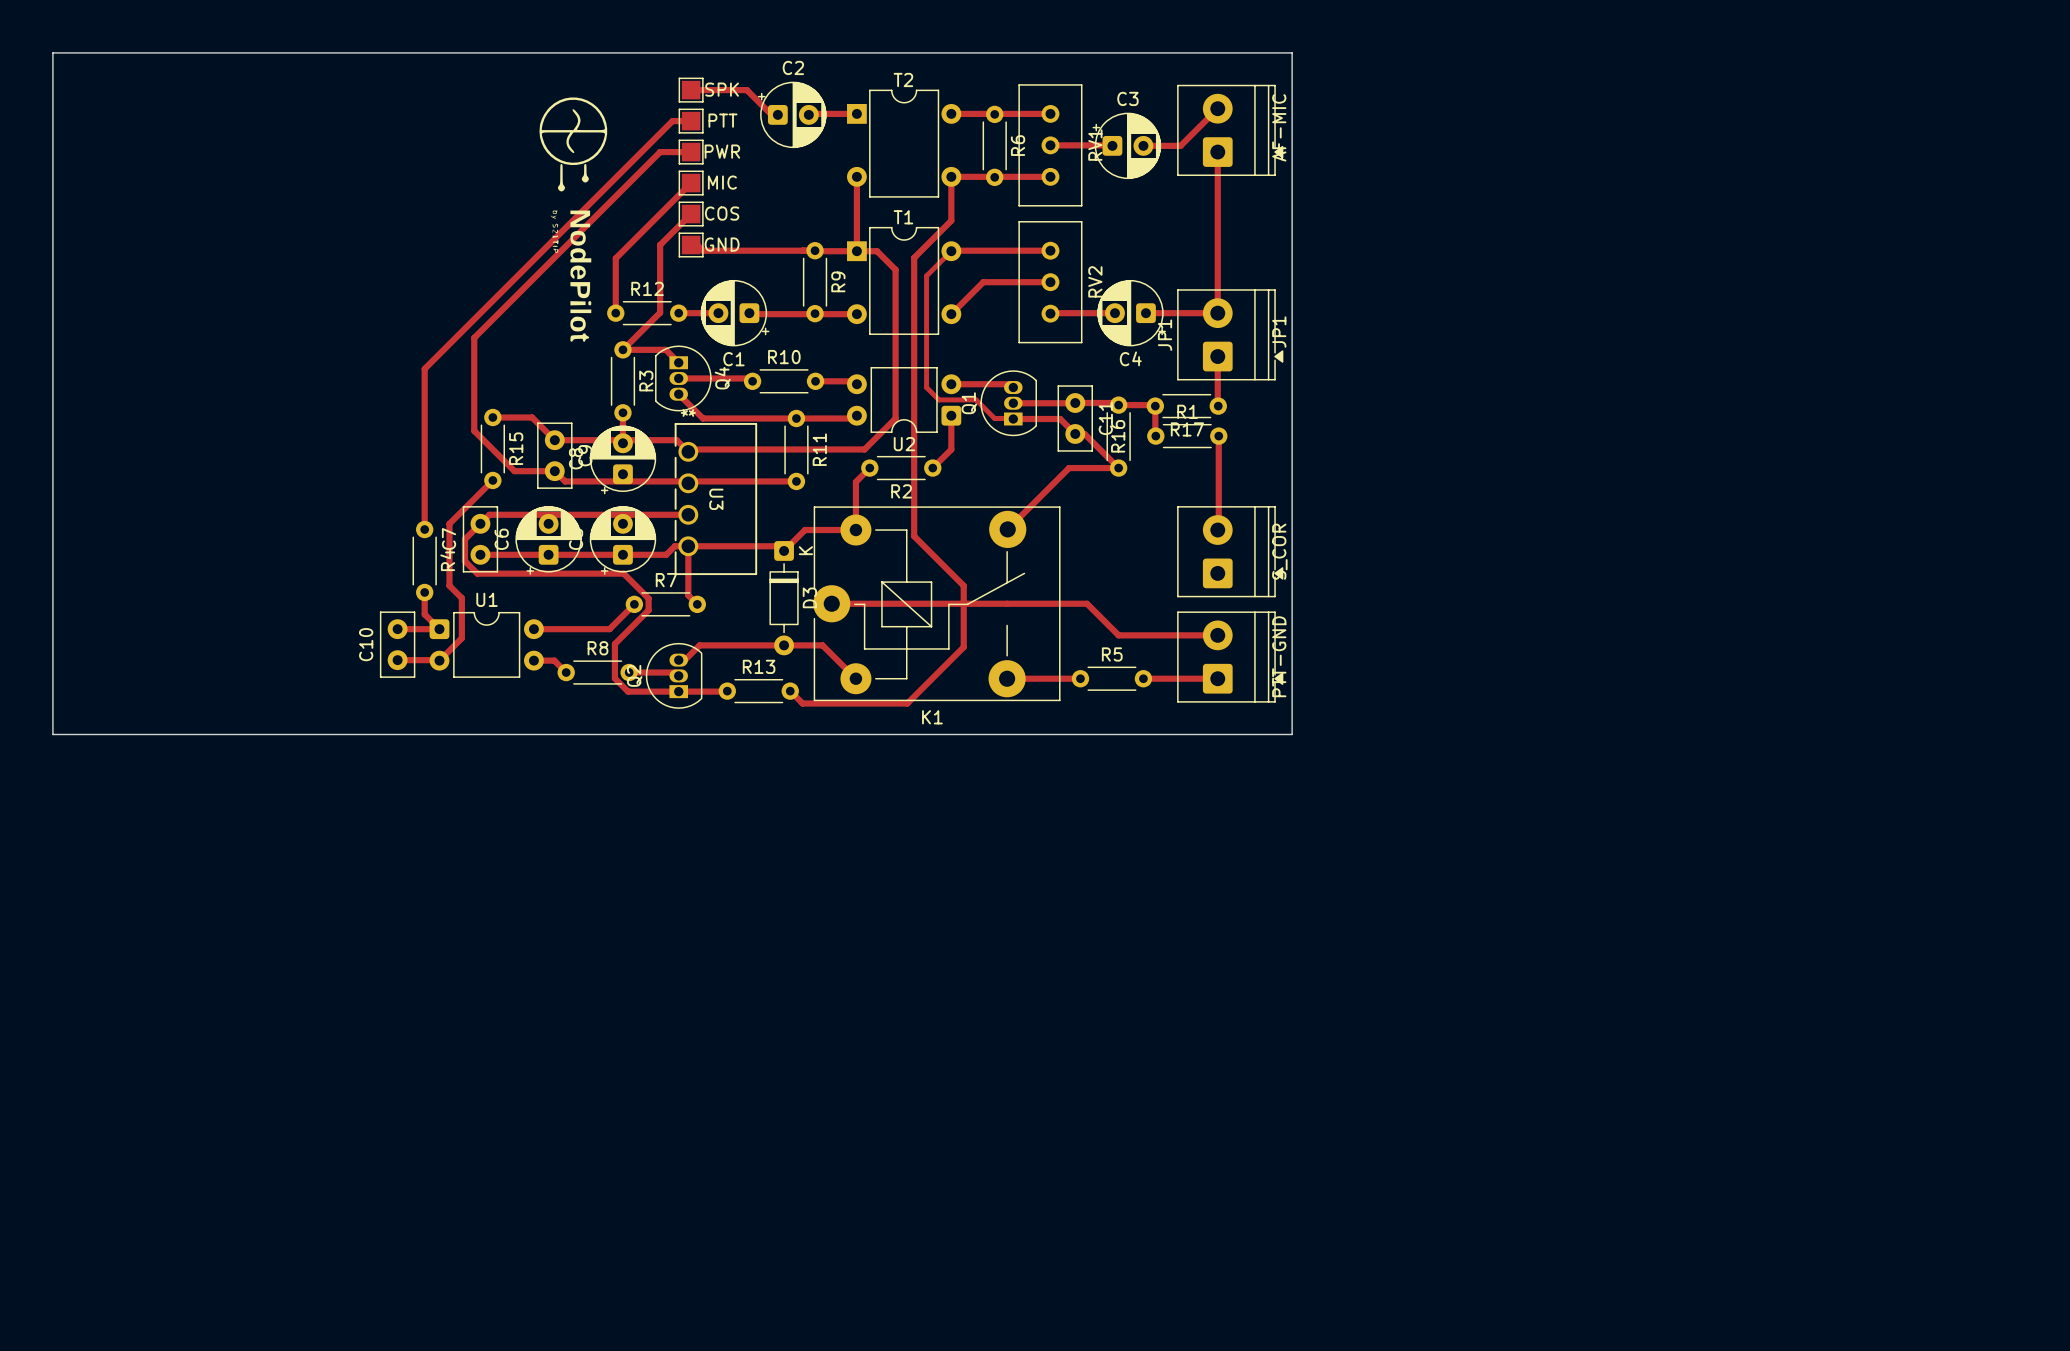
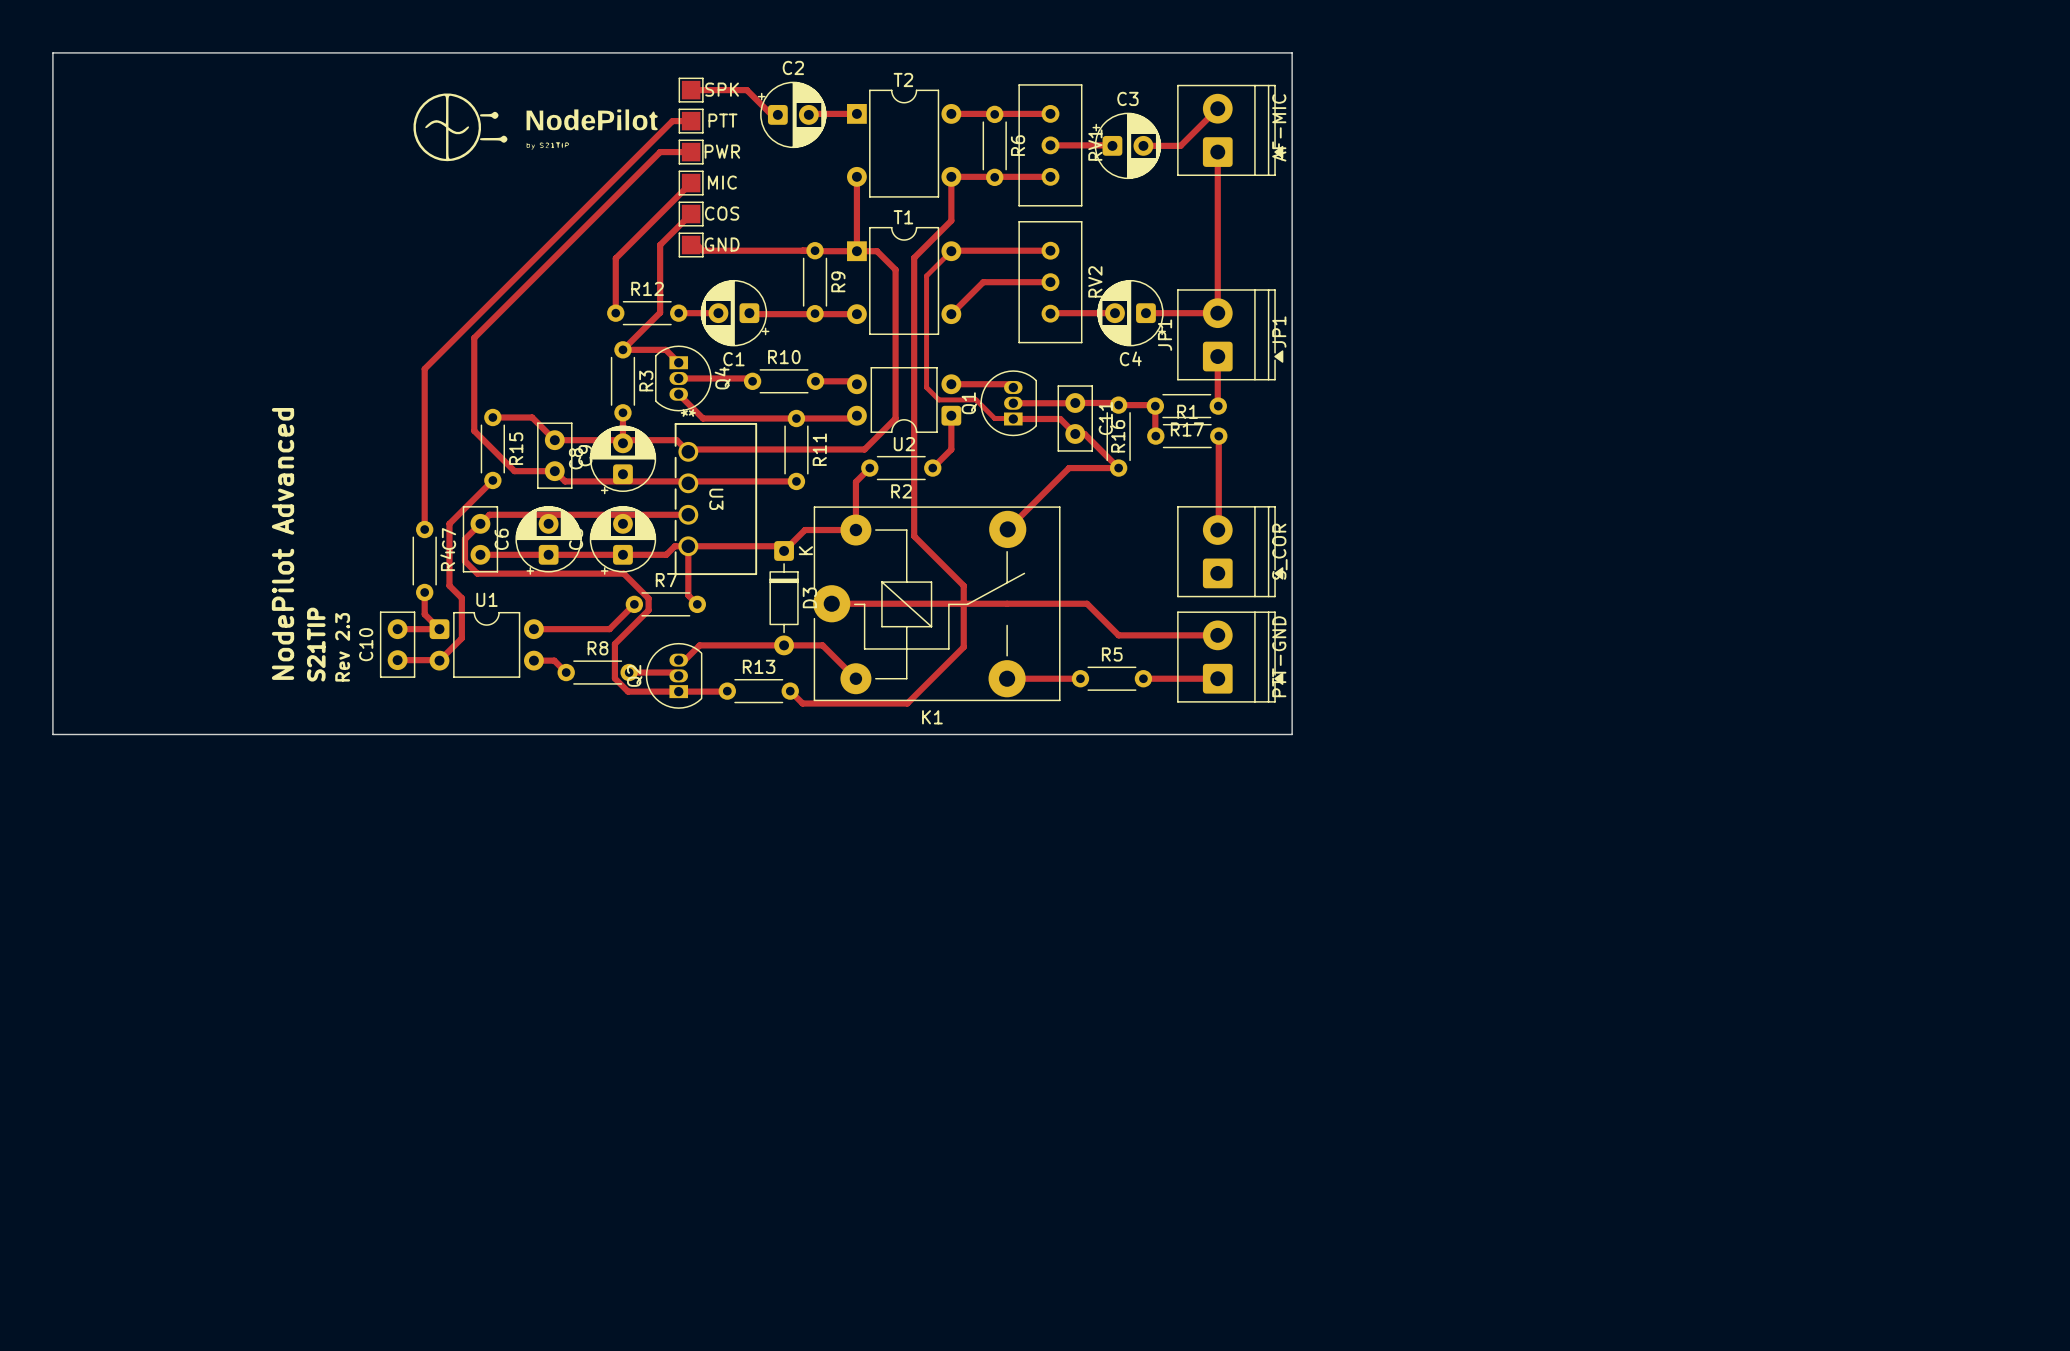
drawing: none -> [413, 93, 658, 162]
drawing: [539, 97, 608, 342] -> none
text: none -> NodePilot Advanced (283, 543)
text: none -> S21TIP (316, 644)
text: none -> Rev 2.3 (342, 647)

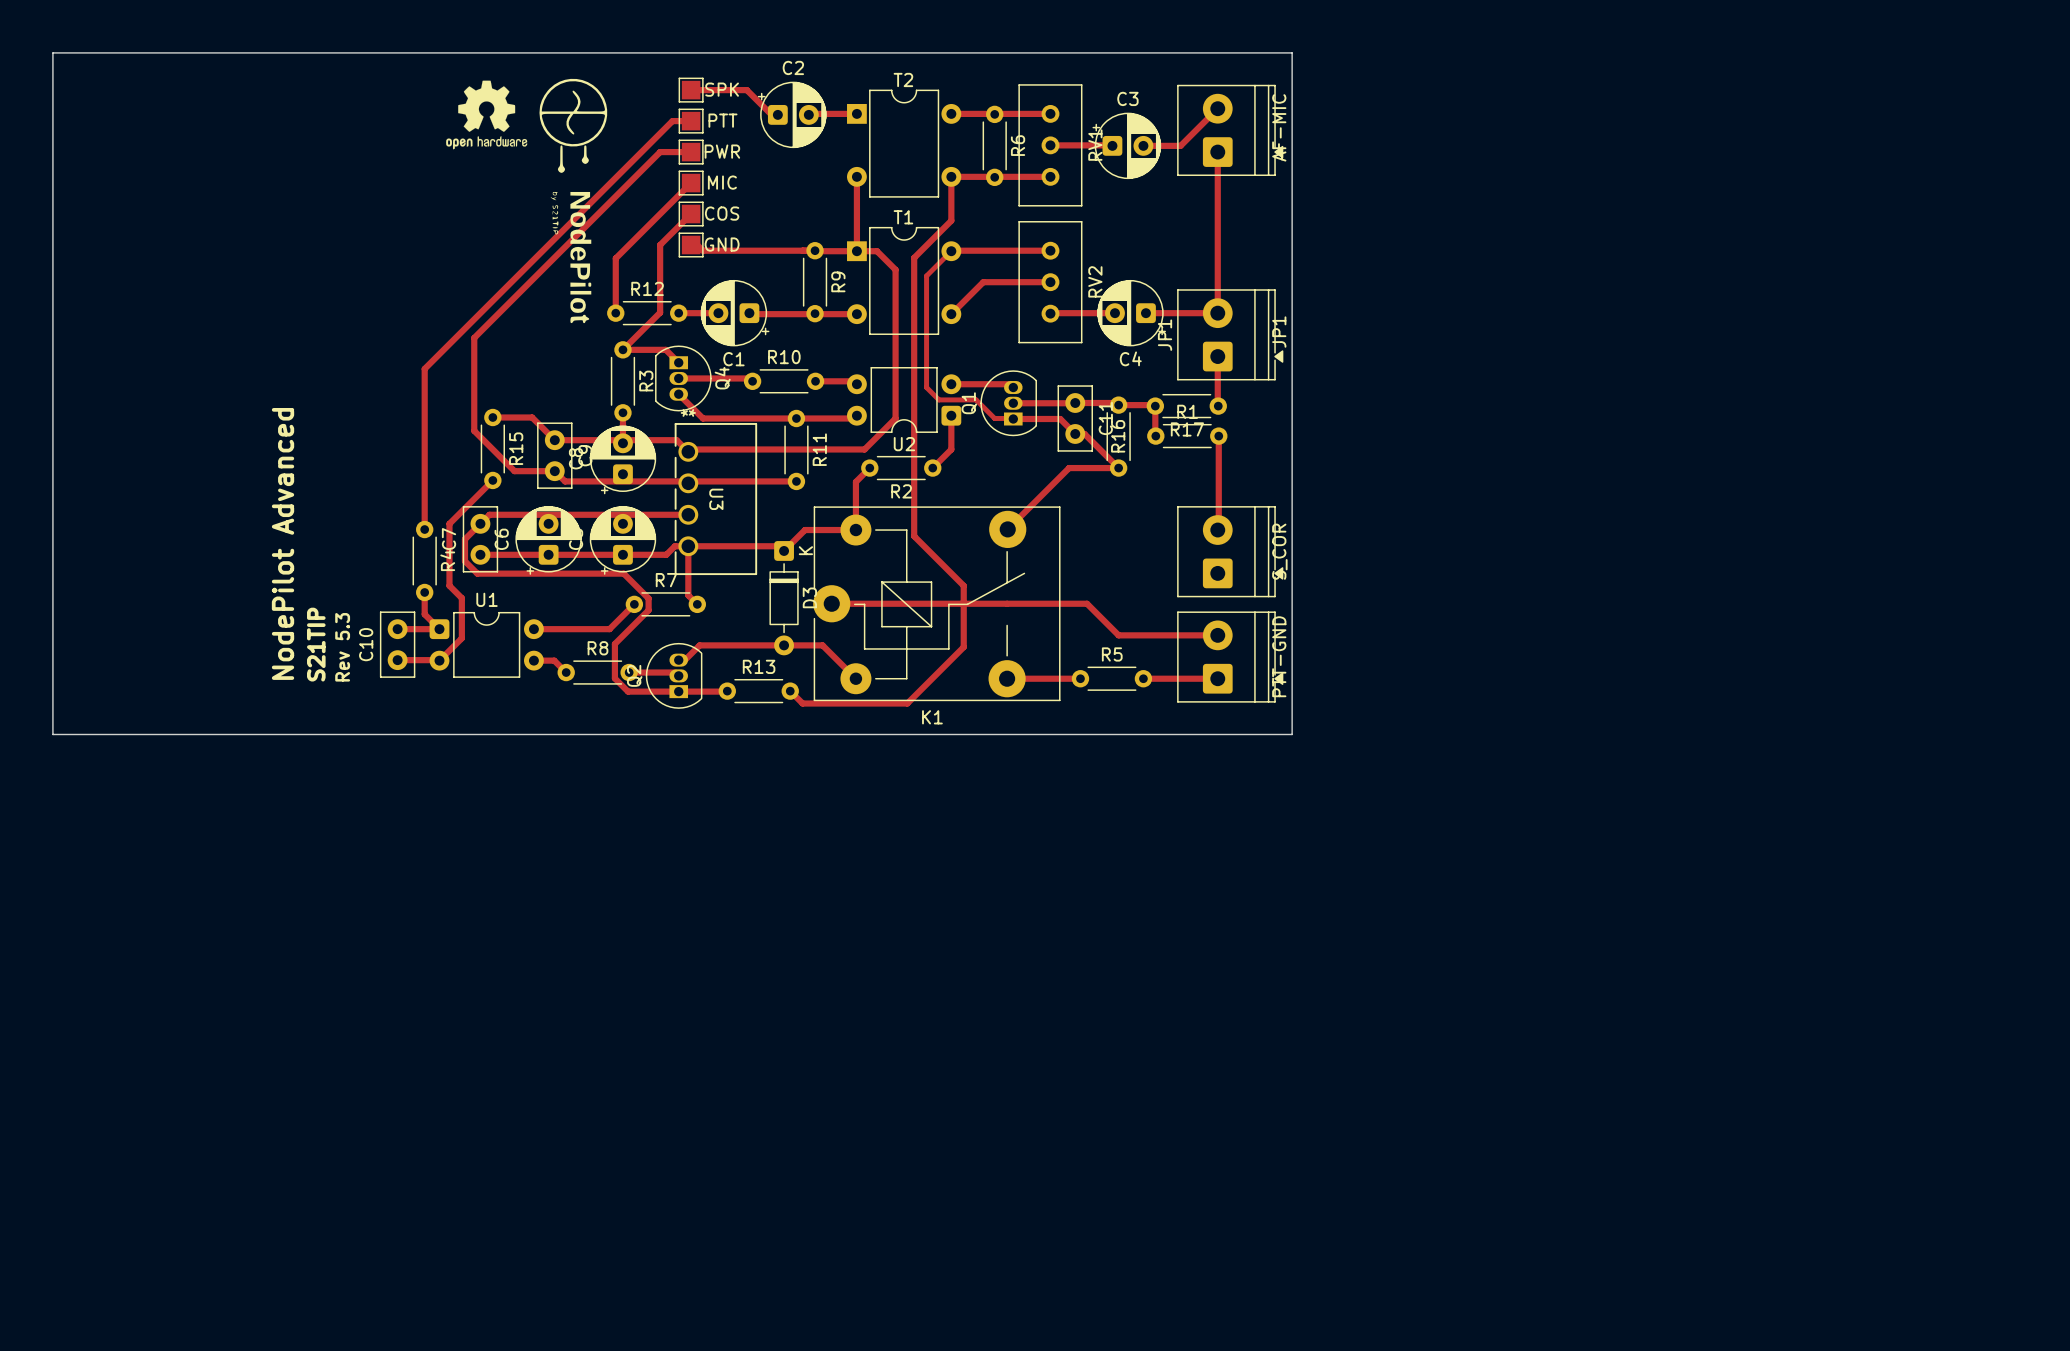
drawing: none -> [446, 78, 608, 324]
drawing: [413, 93, 658, 162] -> none
text: Rev 2.3 (342, 647) -> Rev 5.3 (342, 647)

